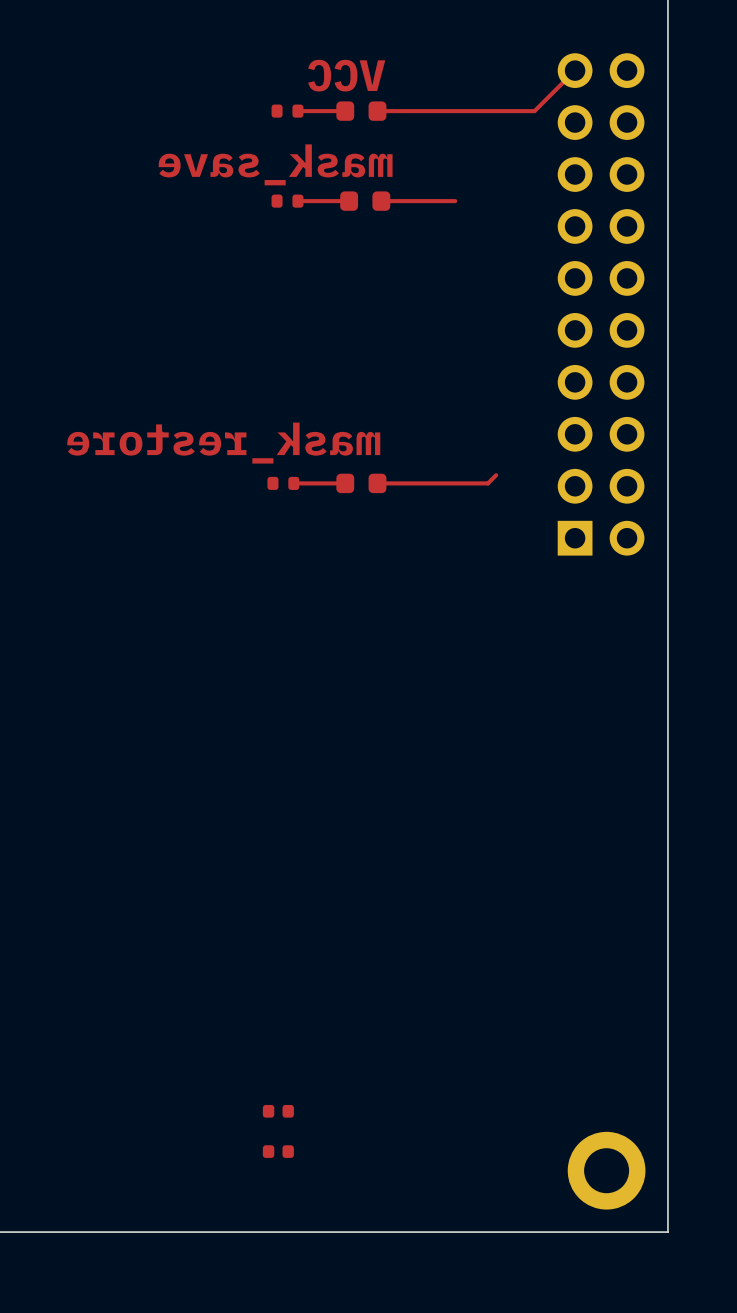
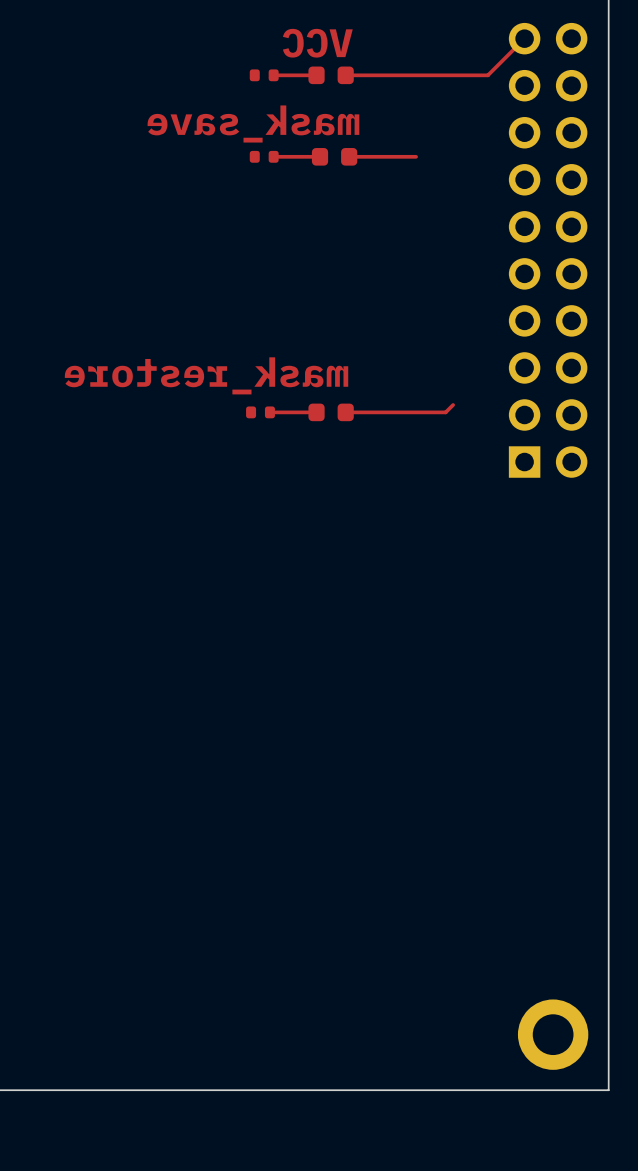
part: (278, 1111) -> none
part: (278, 1151) -> none

